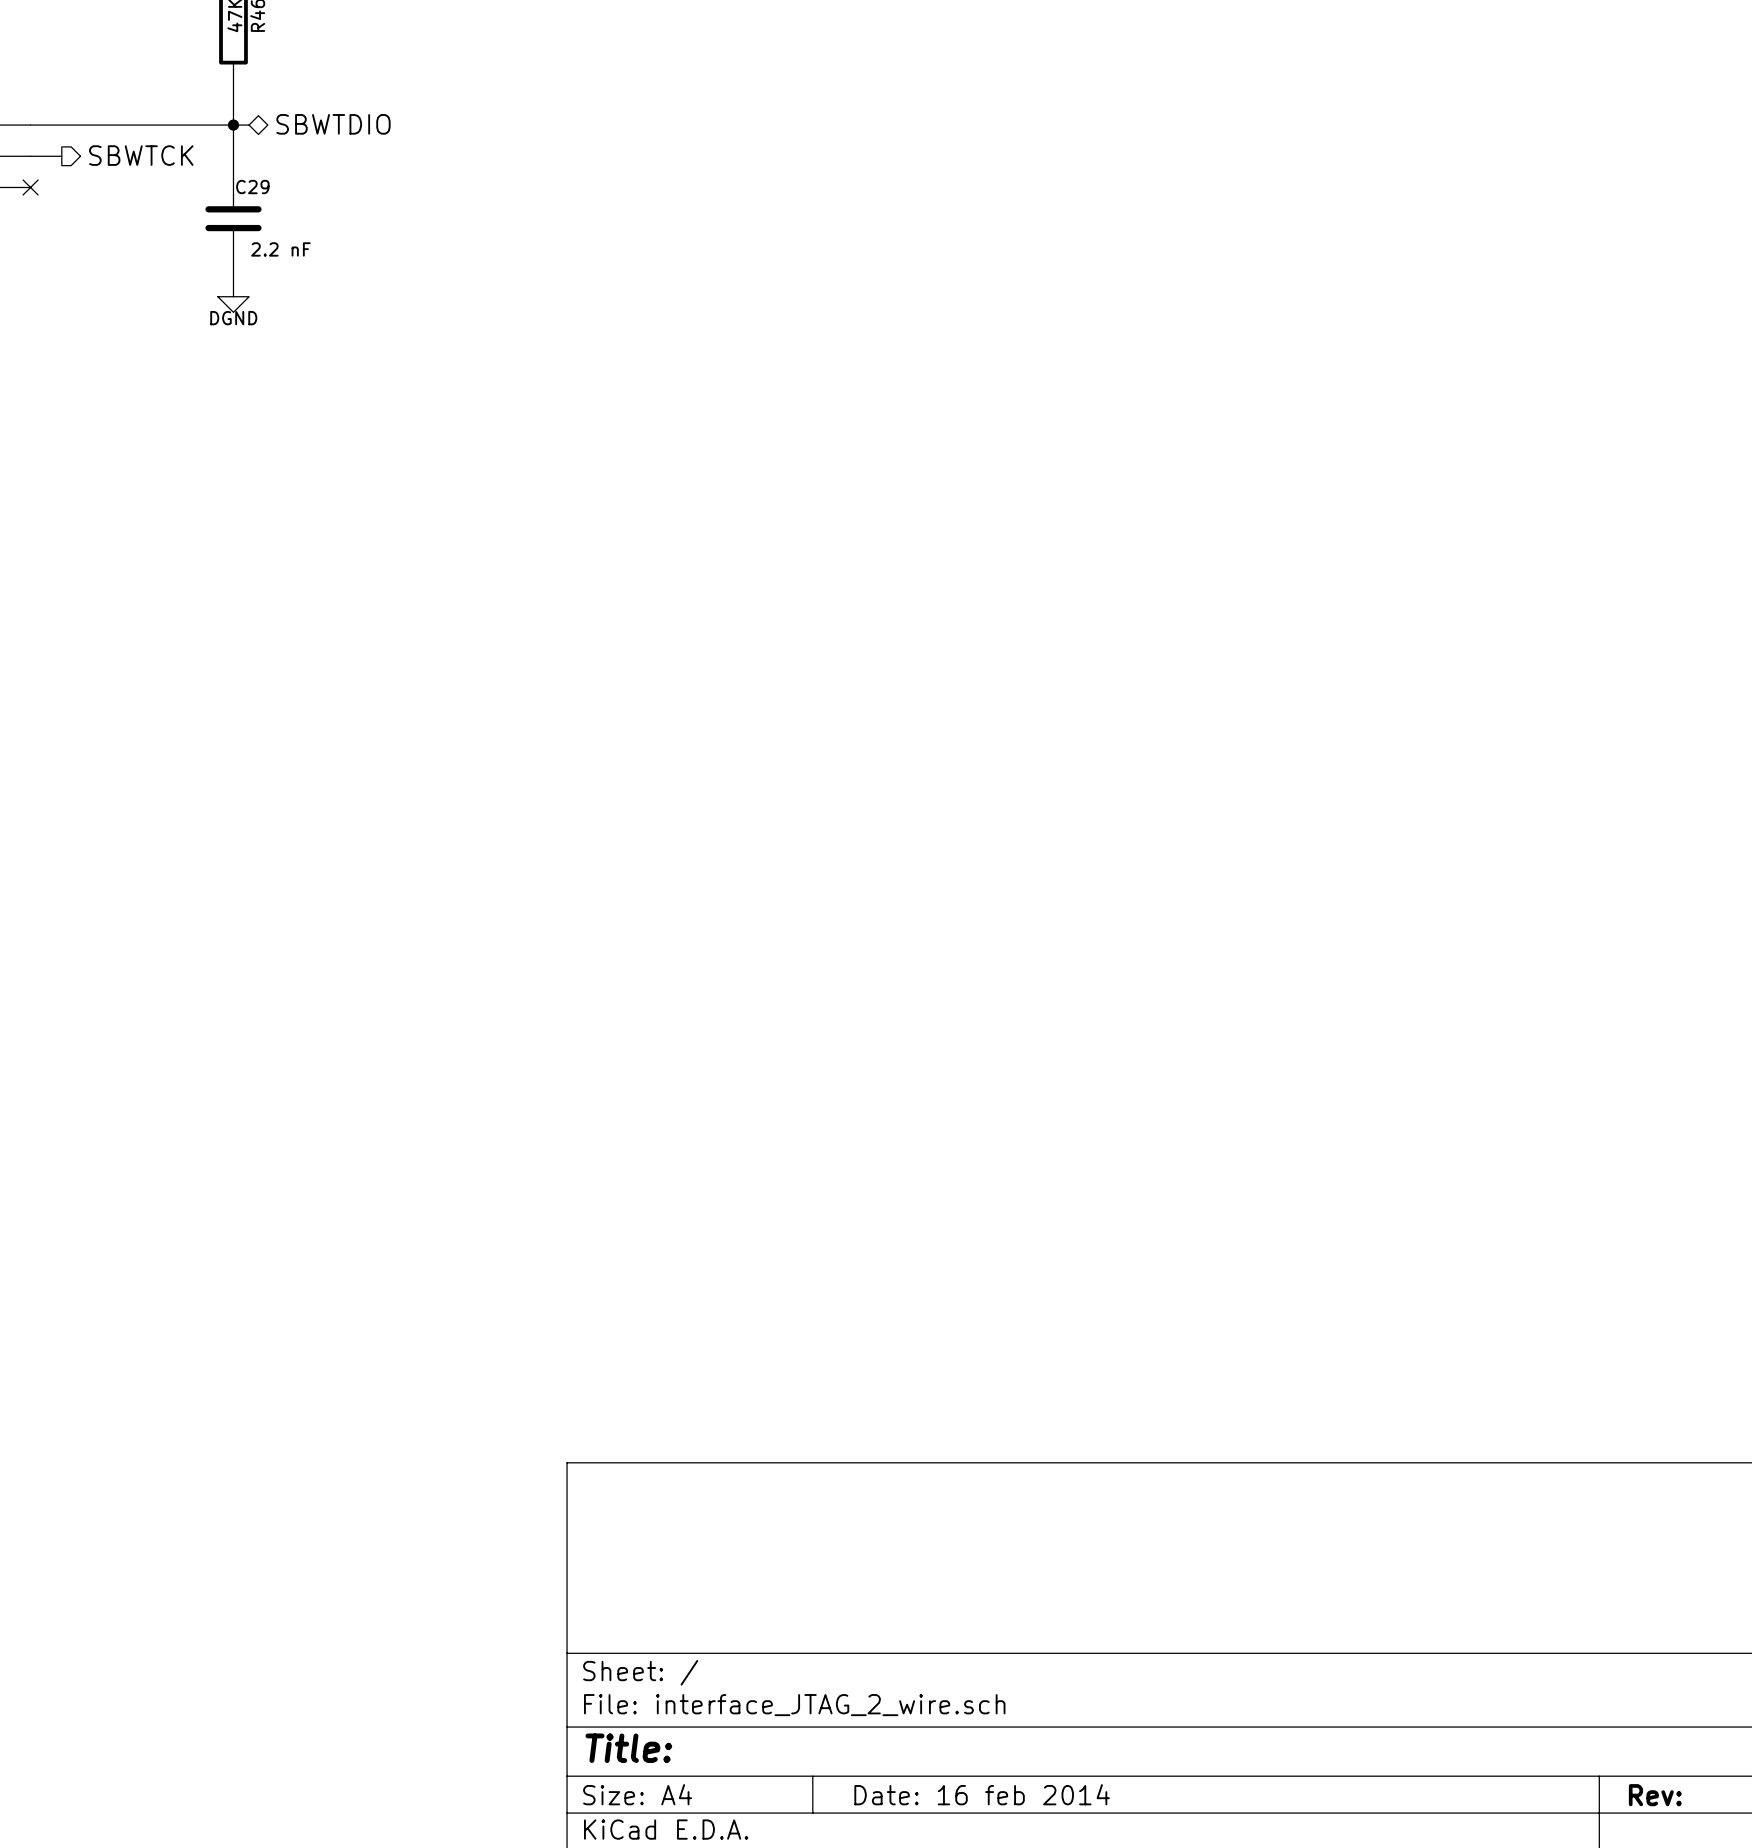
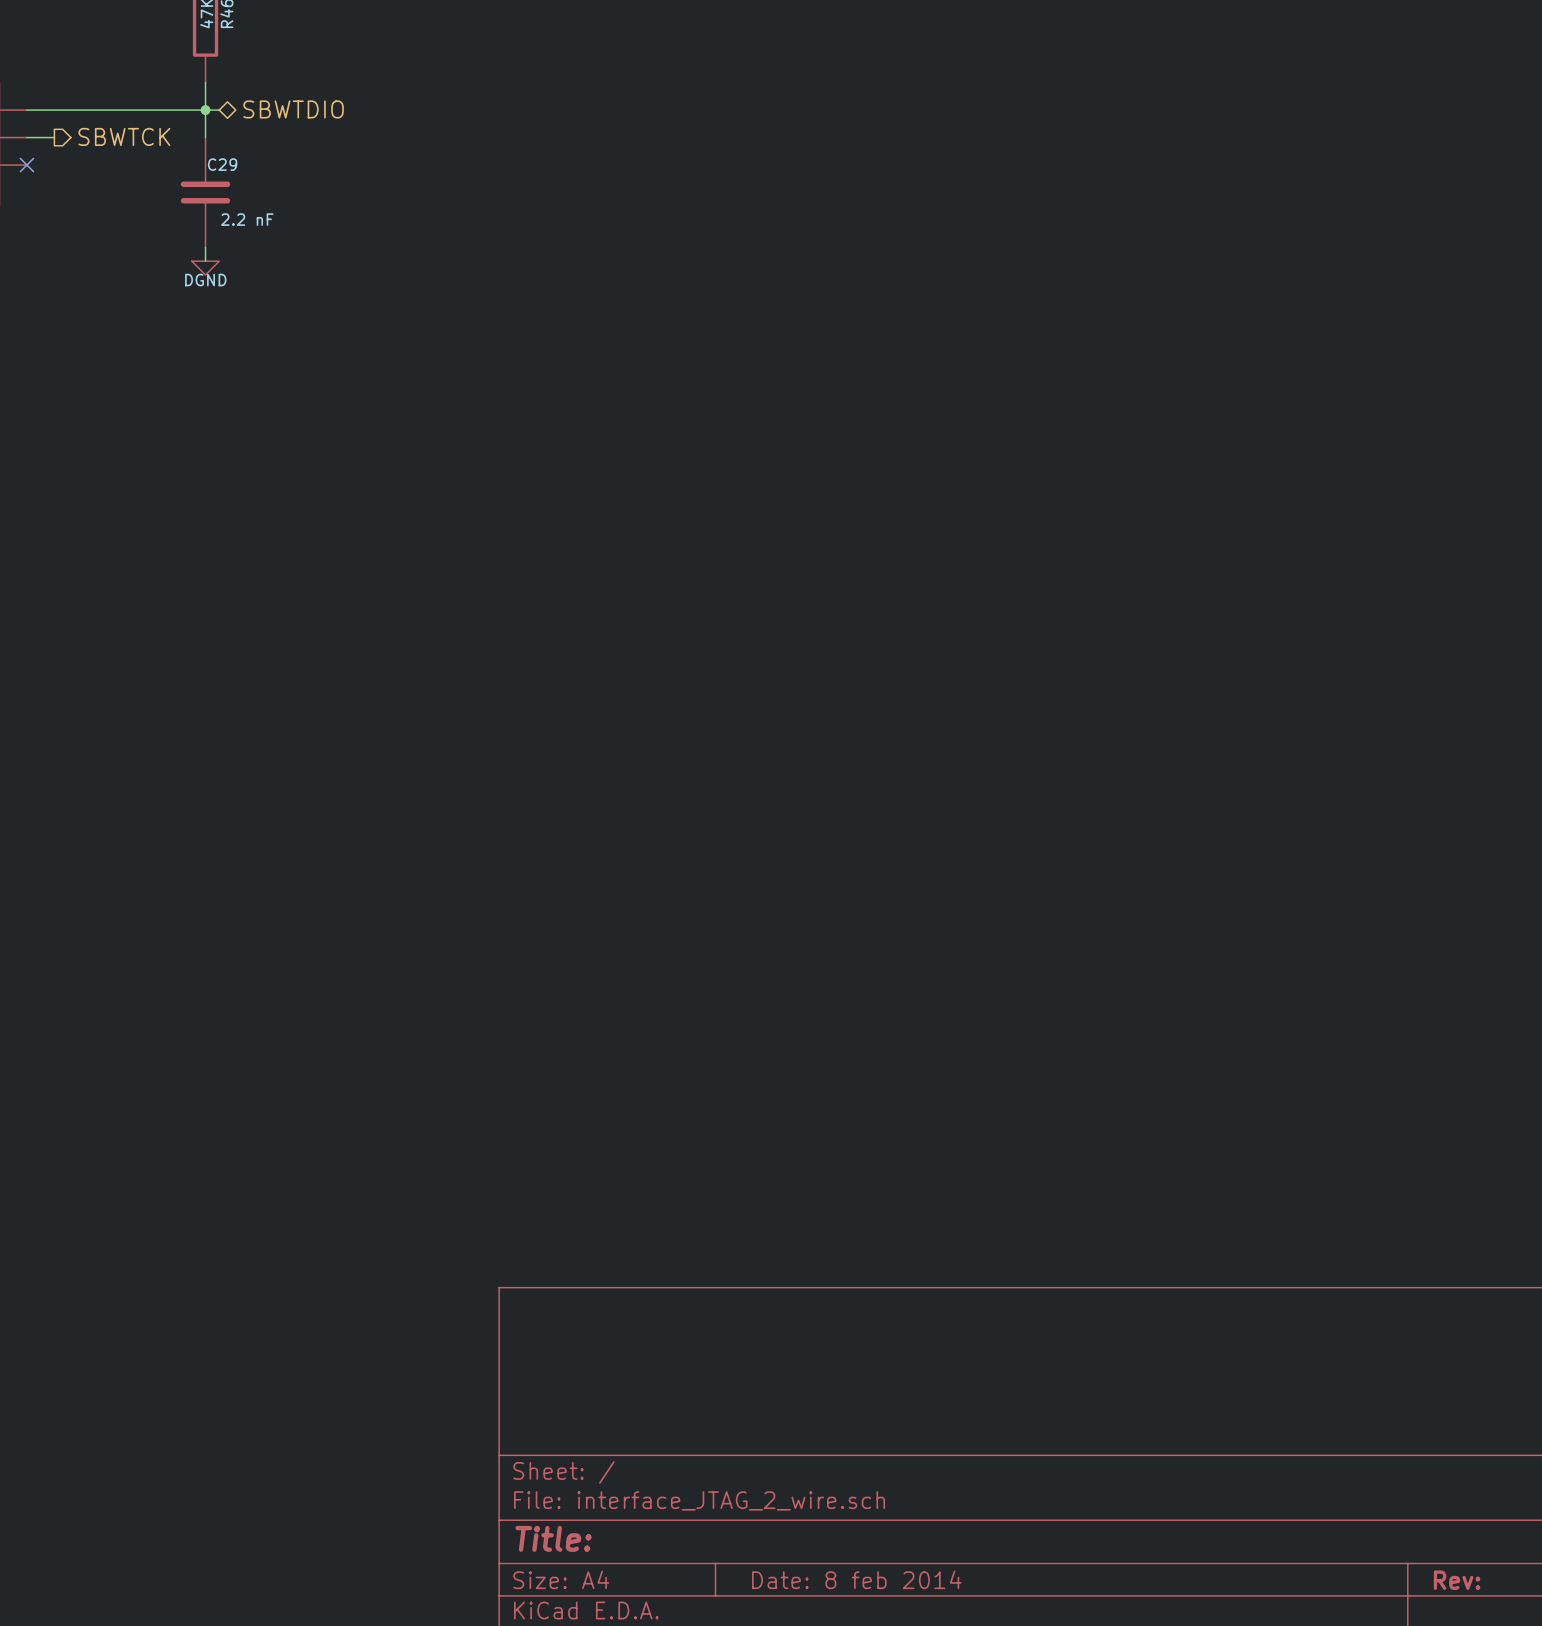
title block: Date: 16 feb 2014 (982, 1794) -> Date: 8 feb 2014 (856, 1579)

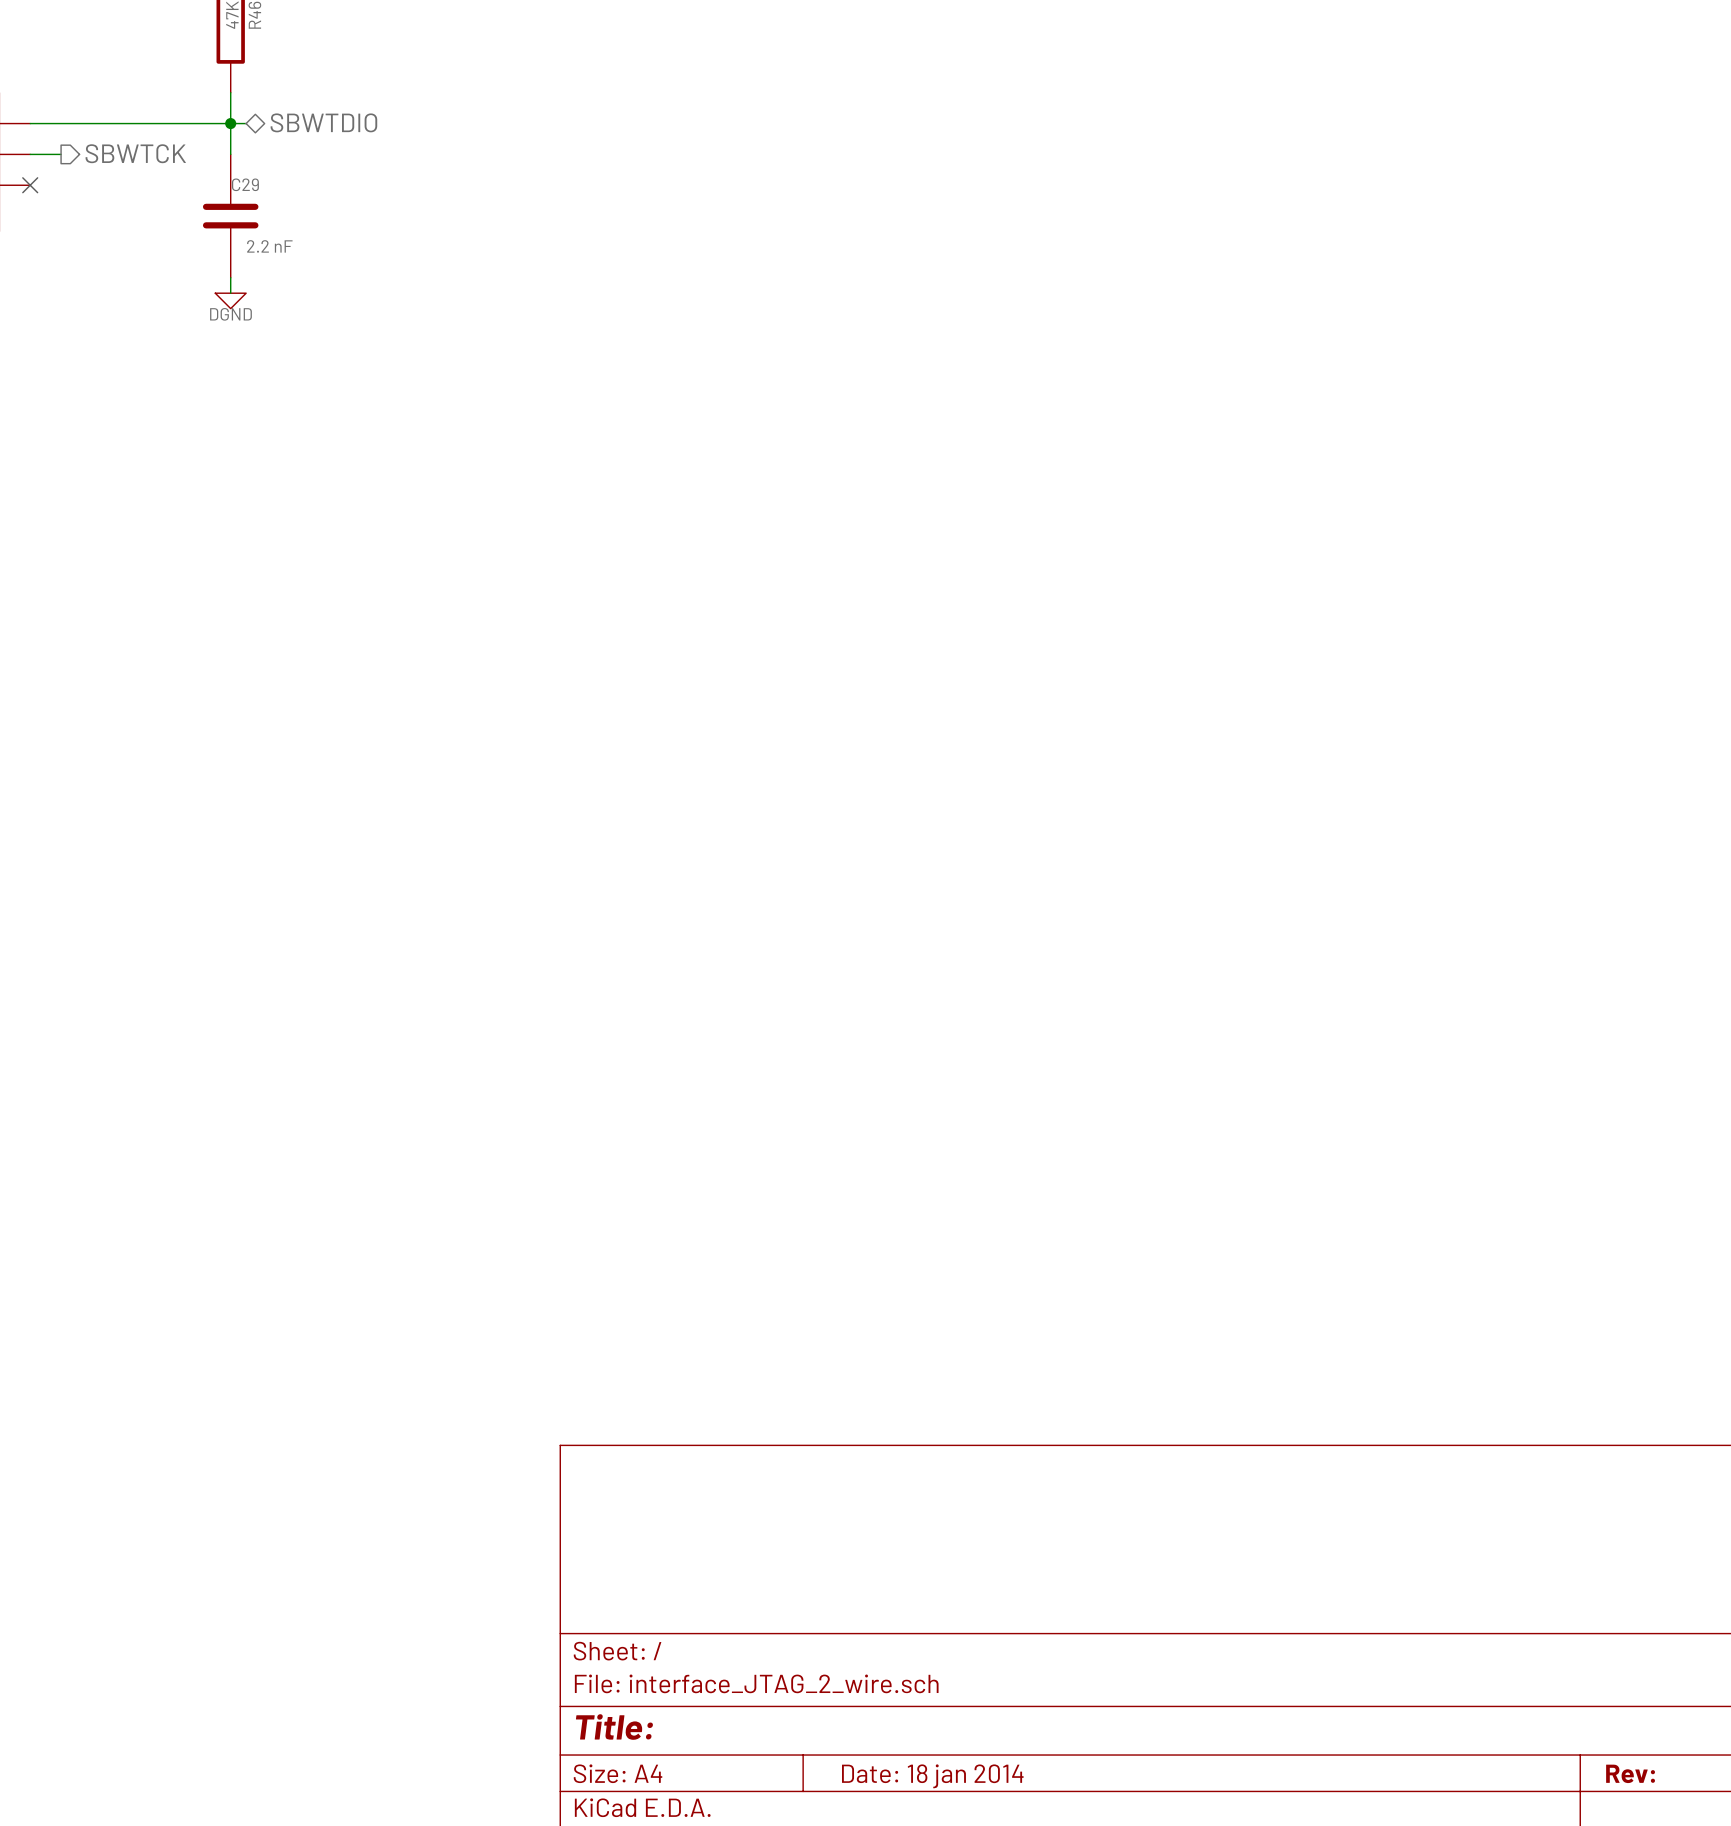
title block: Date: 8 feb 2014 (856, 1579) -> Date: 18 jan 2014 (932, 1776)

